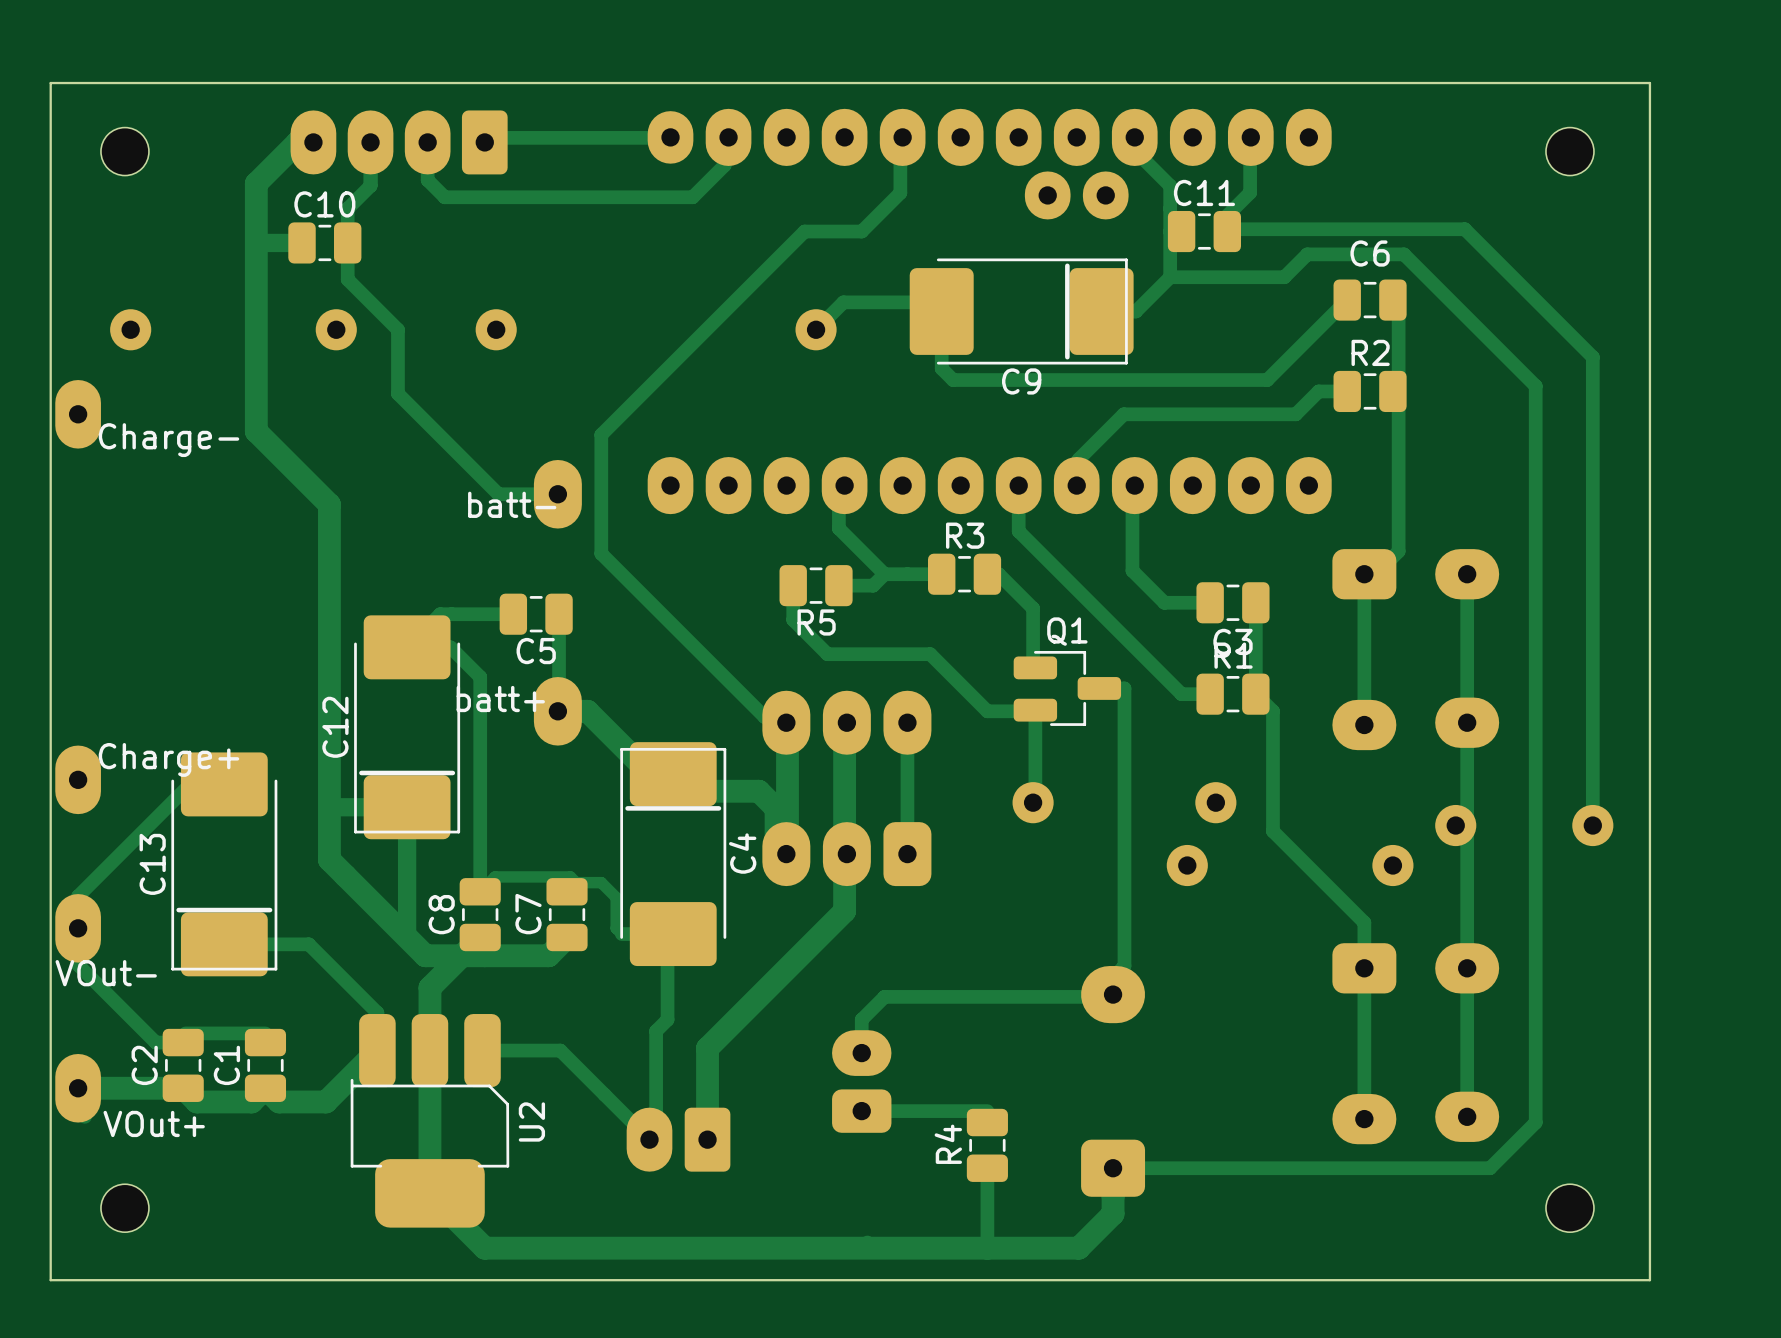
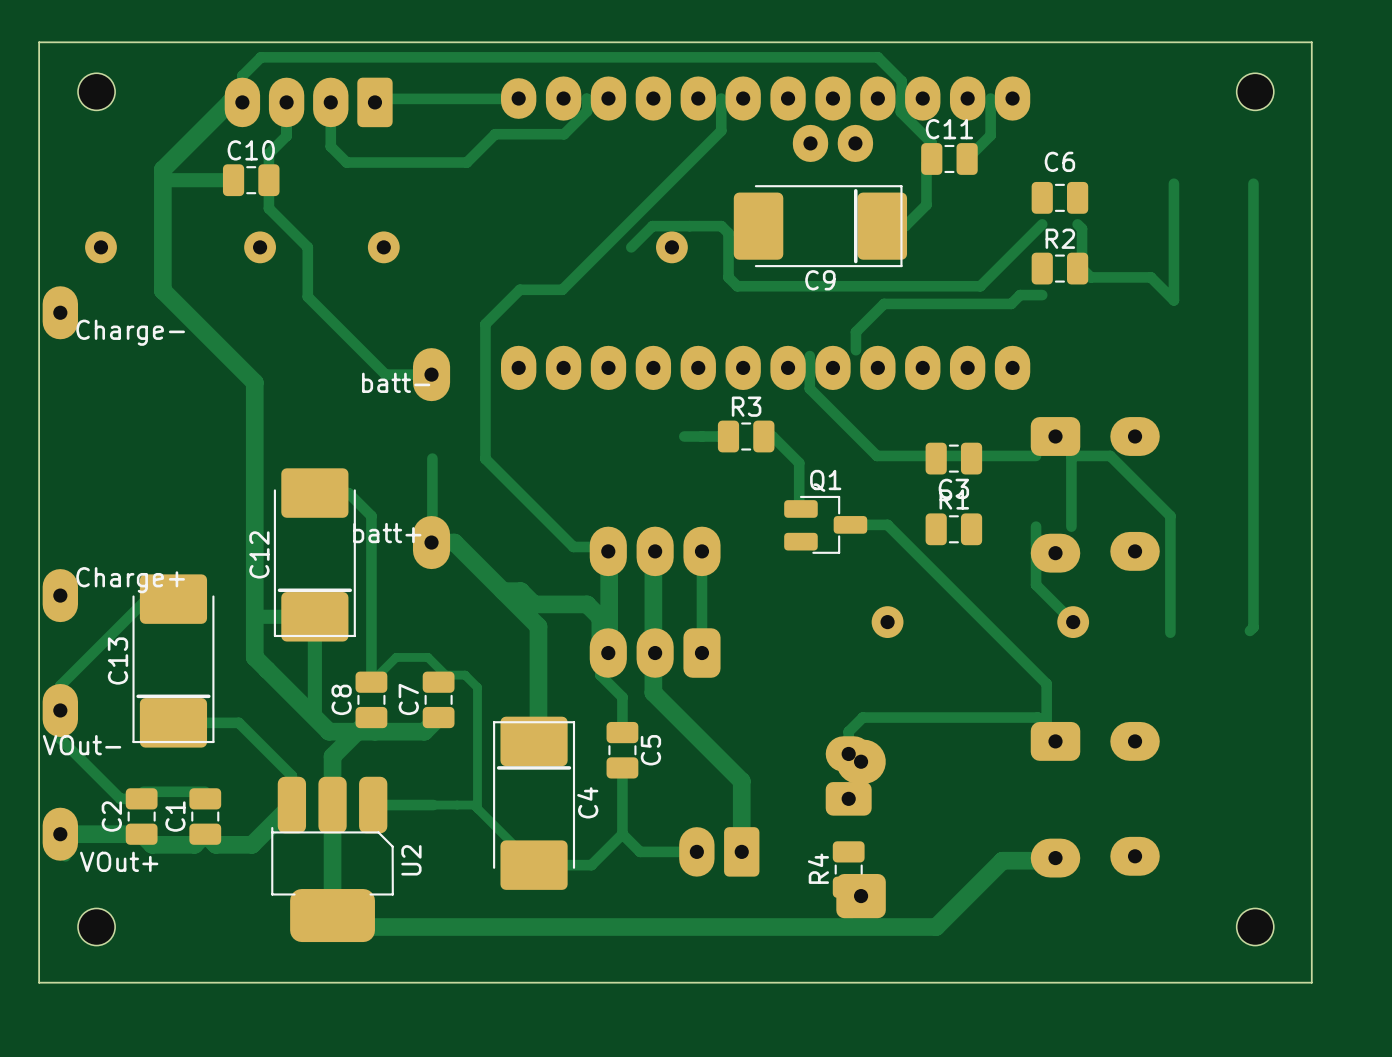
board edge: (50, 83) (1649, 83) (1649, 1280) -> (39, 56) (39, 42) (1311, 42) (1311, 982) (1276, 982)
track: none -> (901, 95) (901, 81) (877, 57) (260, 57) (242, 75) (242, 102)
track: (728, 137) (724, 141) (724, 165) (692, 197) (444, 197) (427, 180) -> (586, 98) (587, 111) (564, 134) (495, 134) (466, 162) (346, 162) (330, 146) (330, 131)
track: (900, 137) (900, 192) (861, 231) (804, 231) (601, 434) (601, 553) (764, 717) -> (721, 98) (721, 130) (562, 289) (519, 289) (485, 324) (485, 458) (573, 546) (591, 546)
track: (1134, 137) (1134, 150) (1170, 185) (1170, 277) -> none
track: none -> (900, 98) (900, 112) (931, 143) (931, 162)
track: (1257, 137) (1250, 144) (1250, 192) (1227, 215) -> none
track: none -> (990, 98) (990, 135) (967, 158)
part position: (124, 151) -> (96, 91)
part position: (1569, 151) -> (1255, 91)
track: (256, 183) (256, 431) -> (198, 134) (162, 169) (162, 290) (198, 326)
track: none -> (931, 158) (926, 164) (926, 204) (905, 226) (882, 226)
C11 position: (1204, 231) -> (949, 158)
track: (1227, 231) (1229, 229) (1464, 229) (1592, 357) (1592, 825) -> none
track: none -> (162, 180) (198, 180)
track: none -> (1253, 183) (1253, 627) (1249, 630)
track: (1170, 277) (1135, 311) (1101, 311) -> none
track: (1170, 277) (1284, 277) (1307, 254) (1404, 254) (1535, 386) (1535, 1122) (1490, 1168) (1095, 1168) -> none
C6 position: (1370, 300) -> (1059, 197)
C9 position: (1021, 311) -> (820, 226)
part position: (816, 329) -> (671, 247)
track: (1398, 357) (1398, 551) (1364, 585) -> (1082, 268) (1090, 277) (1150, 277) (1173, 300) (1173, 183)
R2 position: (1370, 391) -> (1059, 268)
track: (1307, 402) (1295, 414) (1123, 414) (1078, 459) (1078, 482) -> (1011, 303) (884, 303) (855, 332) (855, 350)
track: none -> (809, 356) (809, 388) (876, 455) (1036, 455)
track: (838, 475) (838, 528) (884, 574) (873, 585) (838, 585) -> none
track: (1018, 485) (1018, 531) (1181, 694) (1210, 694) -> none
track: (1132, 485) (1132, 570) (1164, 602) (1210, 602) -> none
track: (1467, 579) (1467, 1116) -> none
track: (793, 585) (793, 619) (827, 654) (930, 654) (987, 711) (1035, 710) (1035, 811) (1033, 814) -> none
R5: (816, 585) -> none
track: (1364, 589) (1364, 736) -> none
track: (1255, 602) (1255, 694) (1272, 711) (1272, 831) (1364, 922) (1364, 1122) -> none
track: (513, 614) (440, 614) (407, 647) -> none
C5 rotation: 0° (536, 614) -> 90° clockwise (622, 750)
C5 position: (536, 614) -> (622, 750)
C5 name position: C5 (536, 651) -> C5 (650, 750)
track: (1124, 688) (1124, 966) (1093, 996) (884, 996) (861, 1019) (861, 1053) -> (869, 524) (887, 524) (1046, 683) (1046, 726) (1037, 717) (862, 717) (848, 731) (848, 746)
track: none -> (1036, 526) (1036, 584) (1073, 622)
track: none -> (1071, 526) (1071, 455) (1110, 455) (1170, 516) (1170, 632)
track: none -> (503, 591) (538, 626) (538, 754)
part: (1033, 802) -> none
part: (1215, 802) -> none
part: none -> (887, 622)
part: none -> (1073, 622)
part: (1455, 825) -> none
part: (1592, 825) -> none
C4 position: (673, 854) -> (534, 803)
track: none -> (600, 655) (600, 675) (622, 697) (622, 732)
part: (1187, 865) -> none
part: (1392, 865) -> none
track: (495, 876) (570, 876) -> (382, 670) (396, 657) (428, 657) (441, 670)
track: (616, 897) (616, 928) (621, 934) (673, 934) (667, 939) (667, 1019) (656, 1031) (656, 1133) (649, 1139) (560, 1050) -> (476, 686) (477, 808)
track: (844, 905) (844, 911) (707, 1048) (707, 1139) -> (653, 692) (741, 781) (741, 851)
track: none -> (622, 767) (622, 834)
track: none -> (433, 805) (473, 805) (534, 865) (591, 865) (622, 834)
part position: (861, 1081) -> (848, 775)
track: none -> (622, 834) (640, 851) (666, 851)
track: (900, 1111) (987, 1111) -> none
part position: (678, 1139) -> (719, 851)
R4 position: (987, 1145) -> (848, 869)
track: (987, 1168) (987, 1248) -> none
track: (1113, 1168) (1113, 1213) (1078, 1248) (484, 1248) (444, 1208) -> (1046, 860) (1002, 860) (936, 927) (344, 927)
part position: (1569, 1208) -> (1255, 927)

